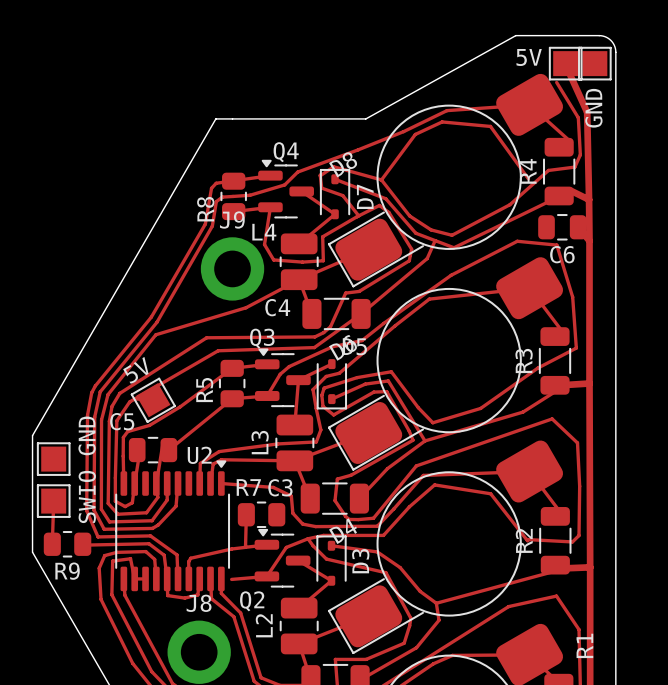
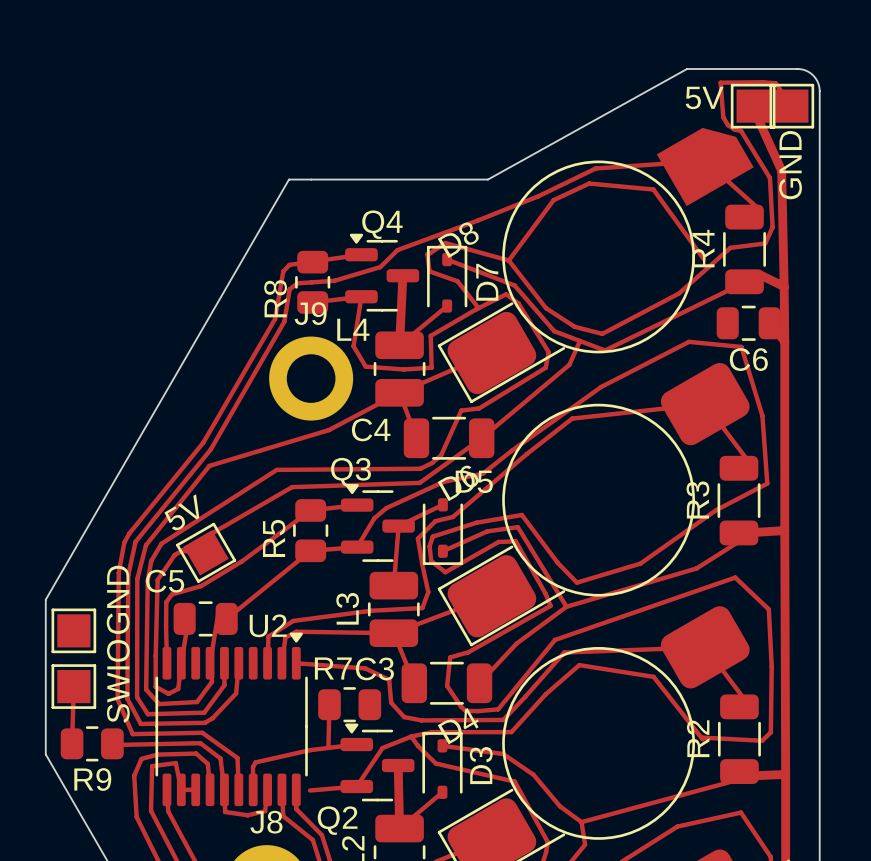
top track: none -> (791, 106) (775, 83) (720, 82) (723, 117) (727, 125) (741, 131)
D8 footprint: [327, 73, 564, 288] -> [437, 127, 754, 404]
top track: (301, 191) (335, 214) -> (402, 275) (399, 345)
top track: (298, 560) (331, 580) -> (398, 765) (399, 828)

